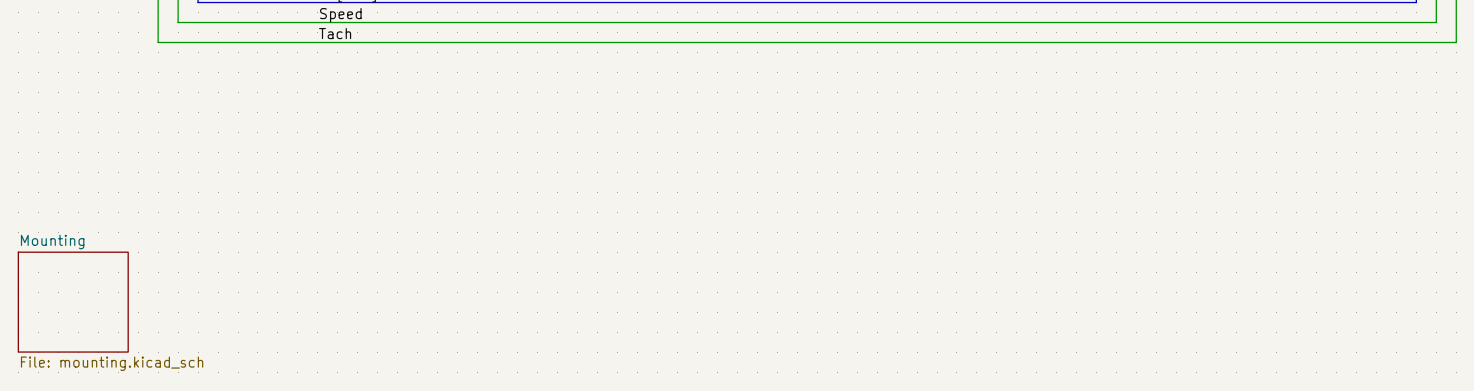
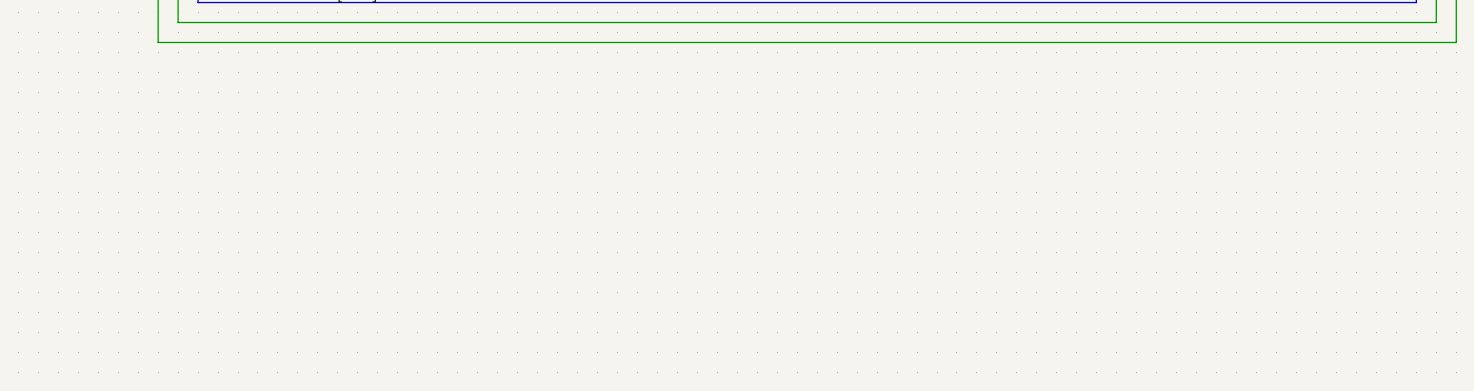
label: Speed (340, 15) -> none
label: Tach (335, 33) -> none
sheet Mounting: File: mounting.kicad_sch (73, 302) -> none

